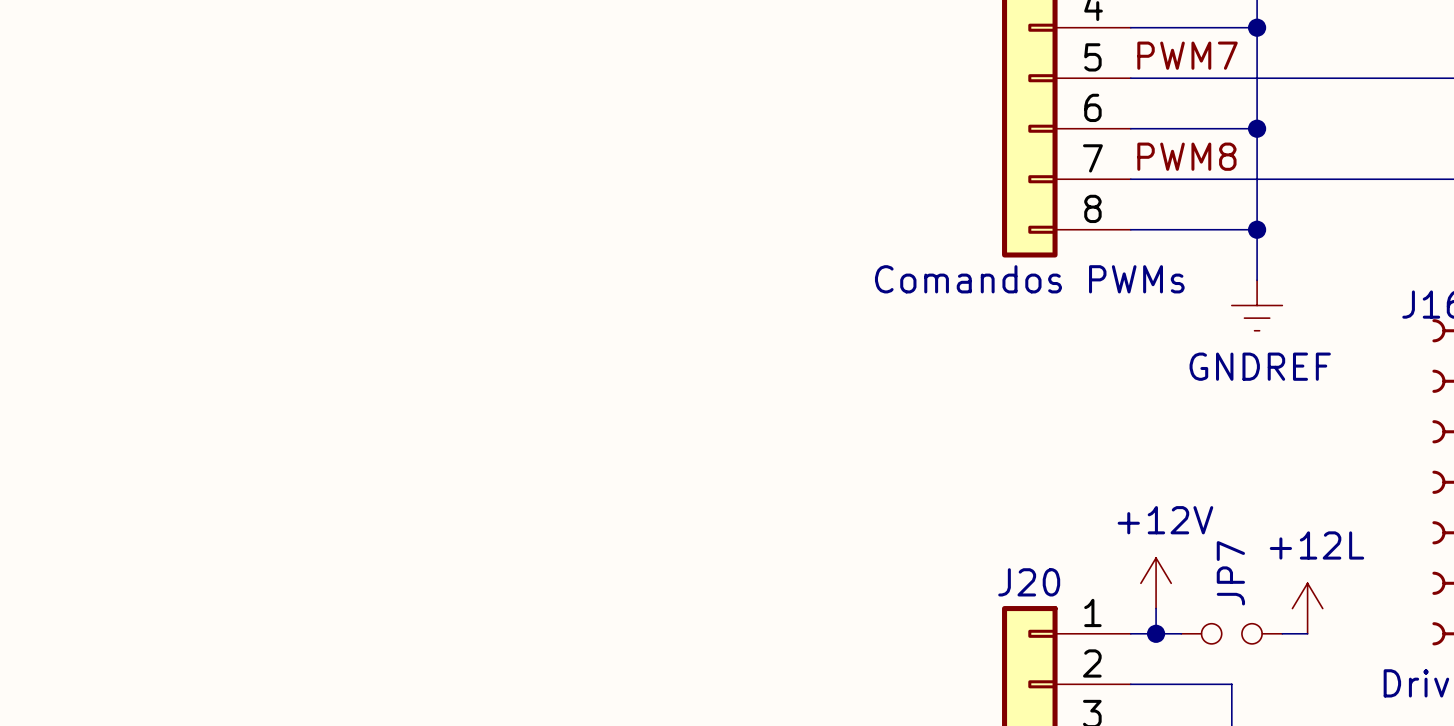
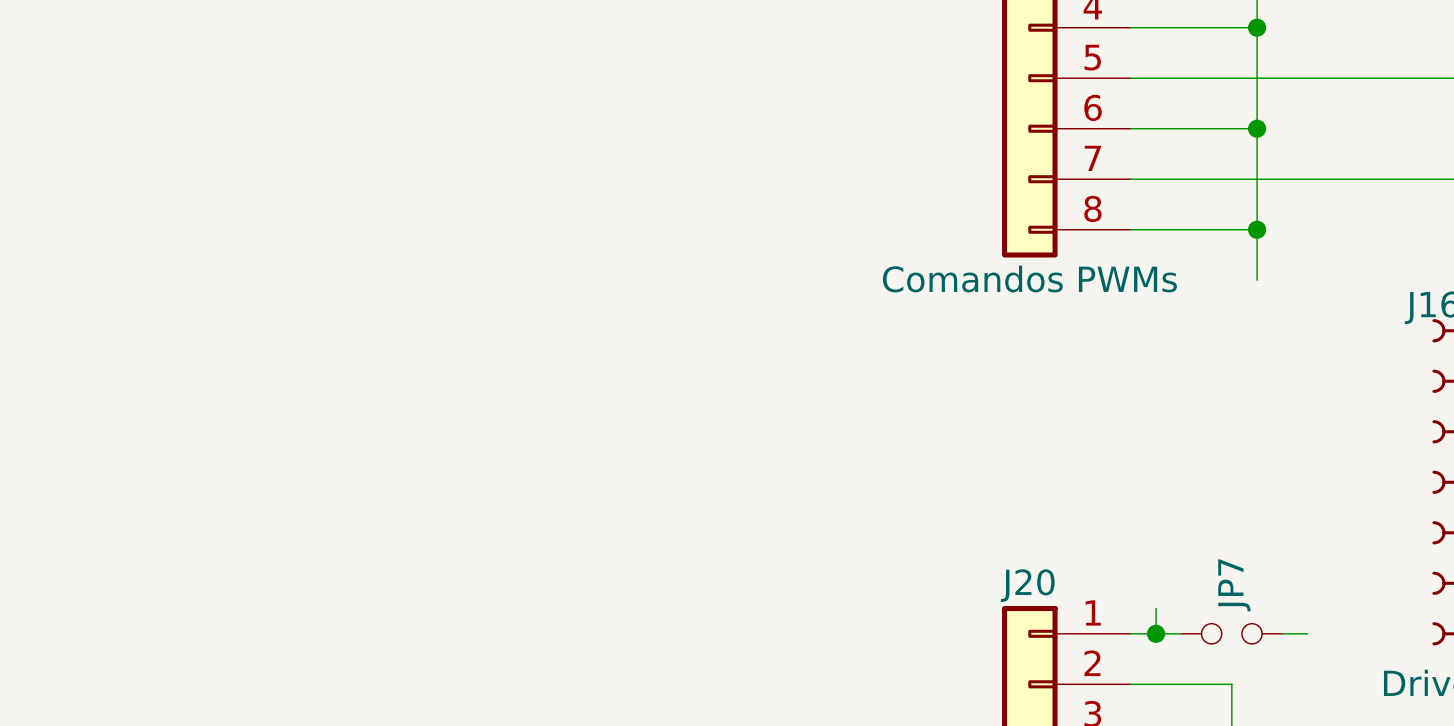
label: PWM7 (1187, 55) -> none
label: PWM8 (1186, 156) -> none
power symbol: GNDREF (1257, 305) -> none
power symbol: +12V (1156, 583) -> none
power symbol: +12L (1307, 608) -> none

